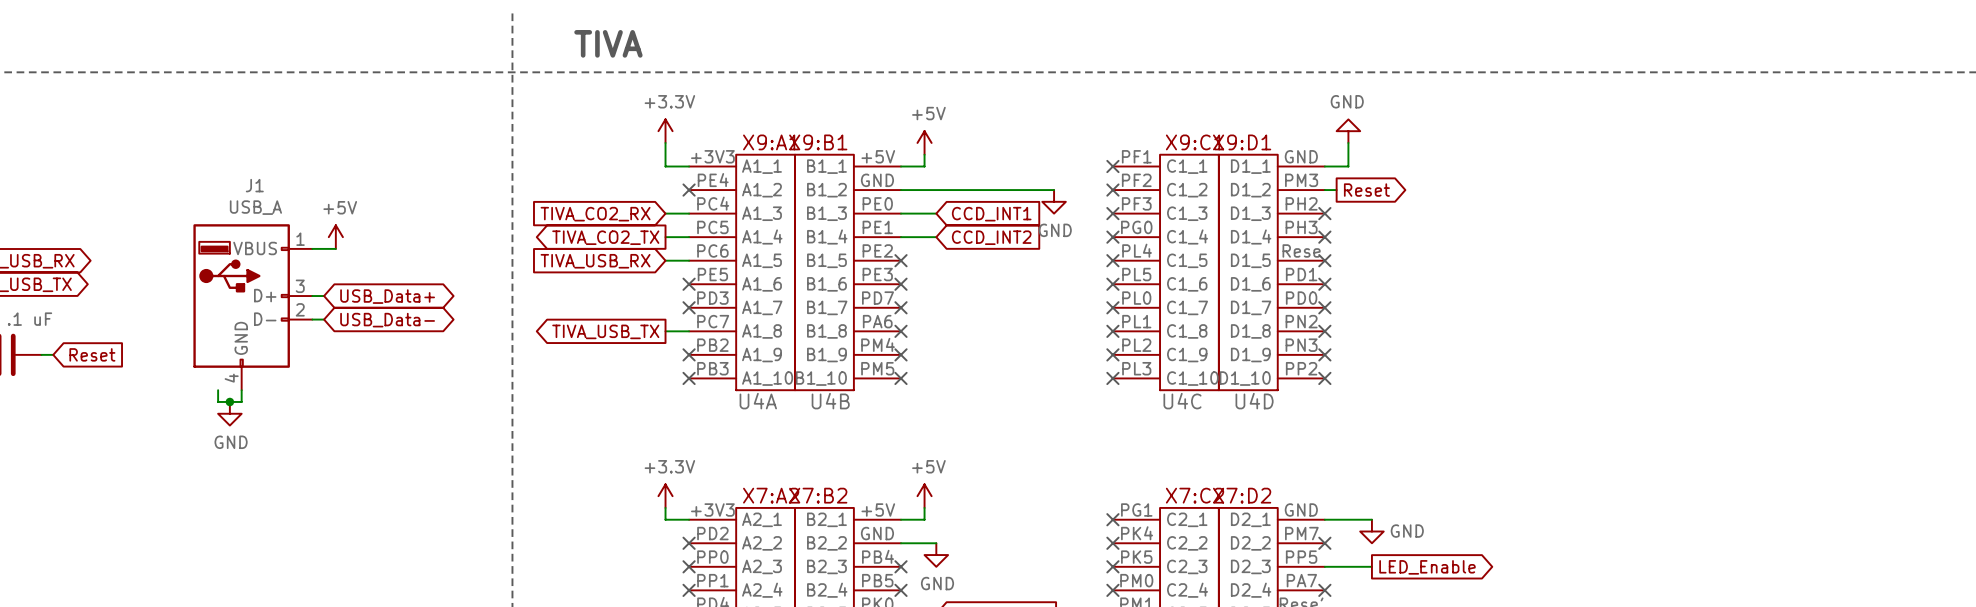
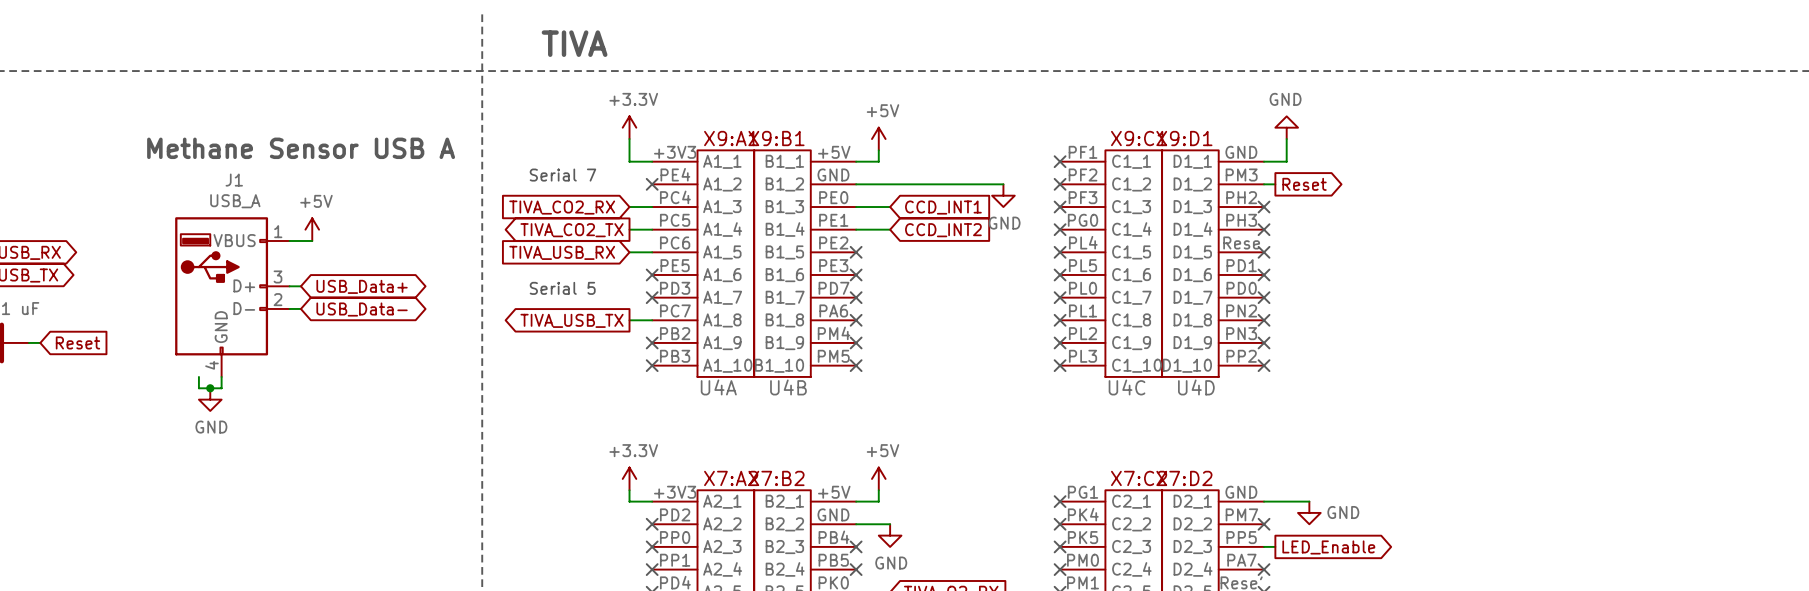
text: none -> Methane Sensor USB A (301, 148)
text: none -> Serial 7 (562, 175)
text: none -> Serial 5 (562, 288)
wire: (1336, 566) (1371, 566) -> none
global label position: LED_Enable (1427, 567) -> LED_Enable (1328, 547)

